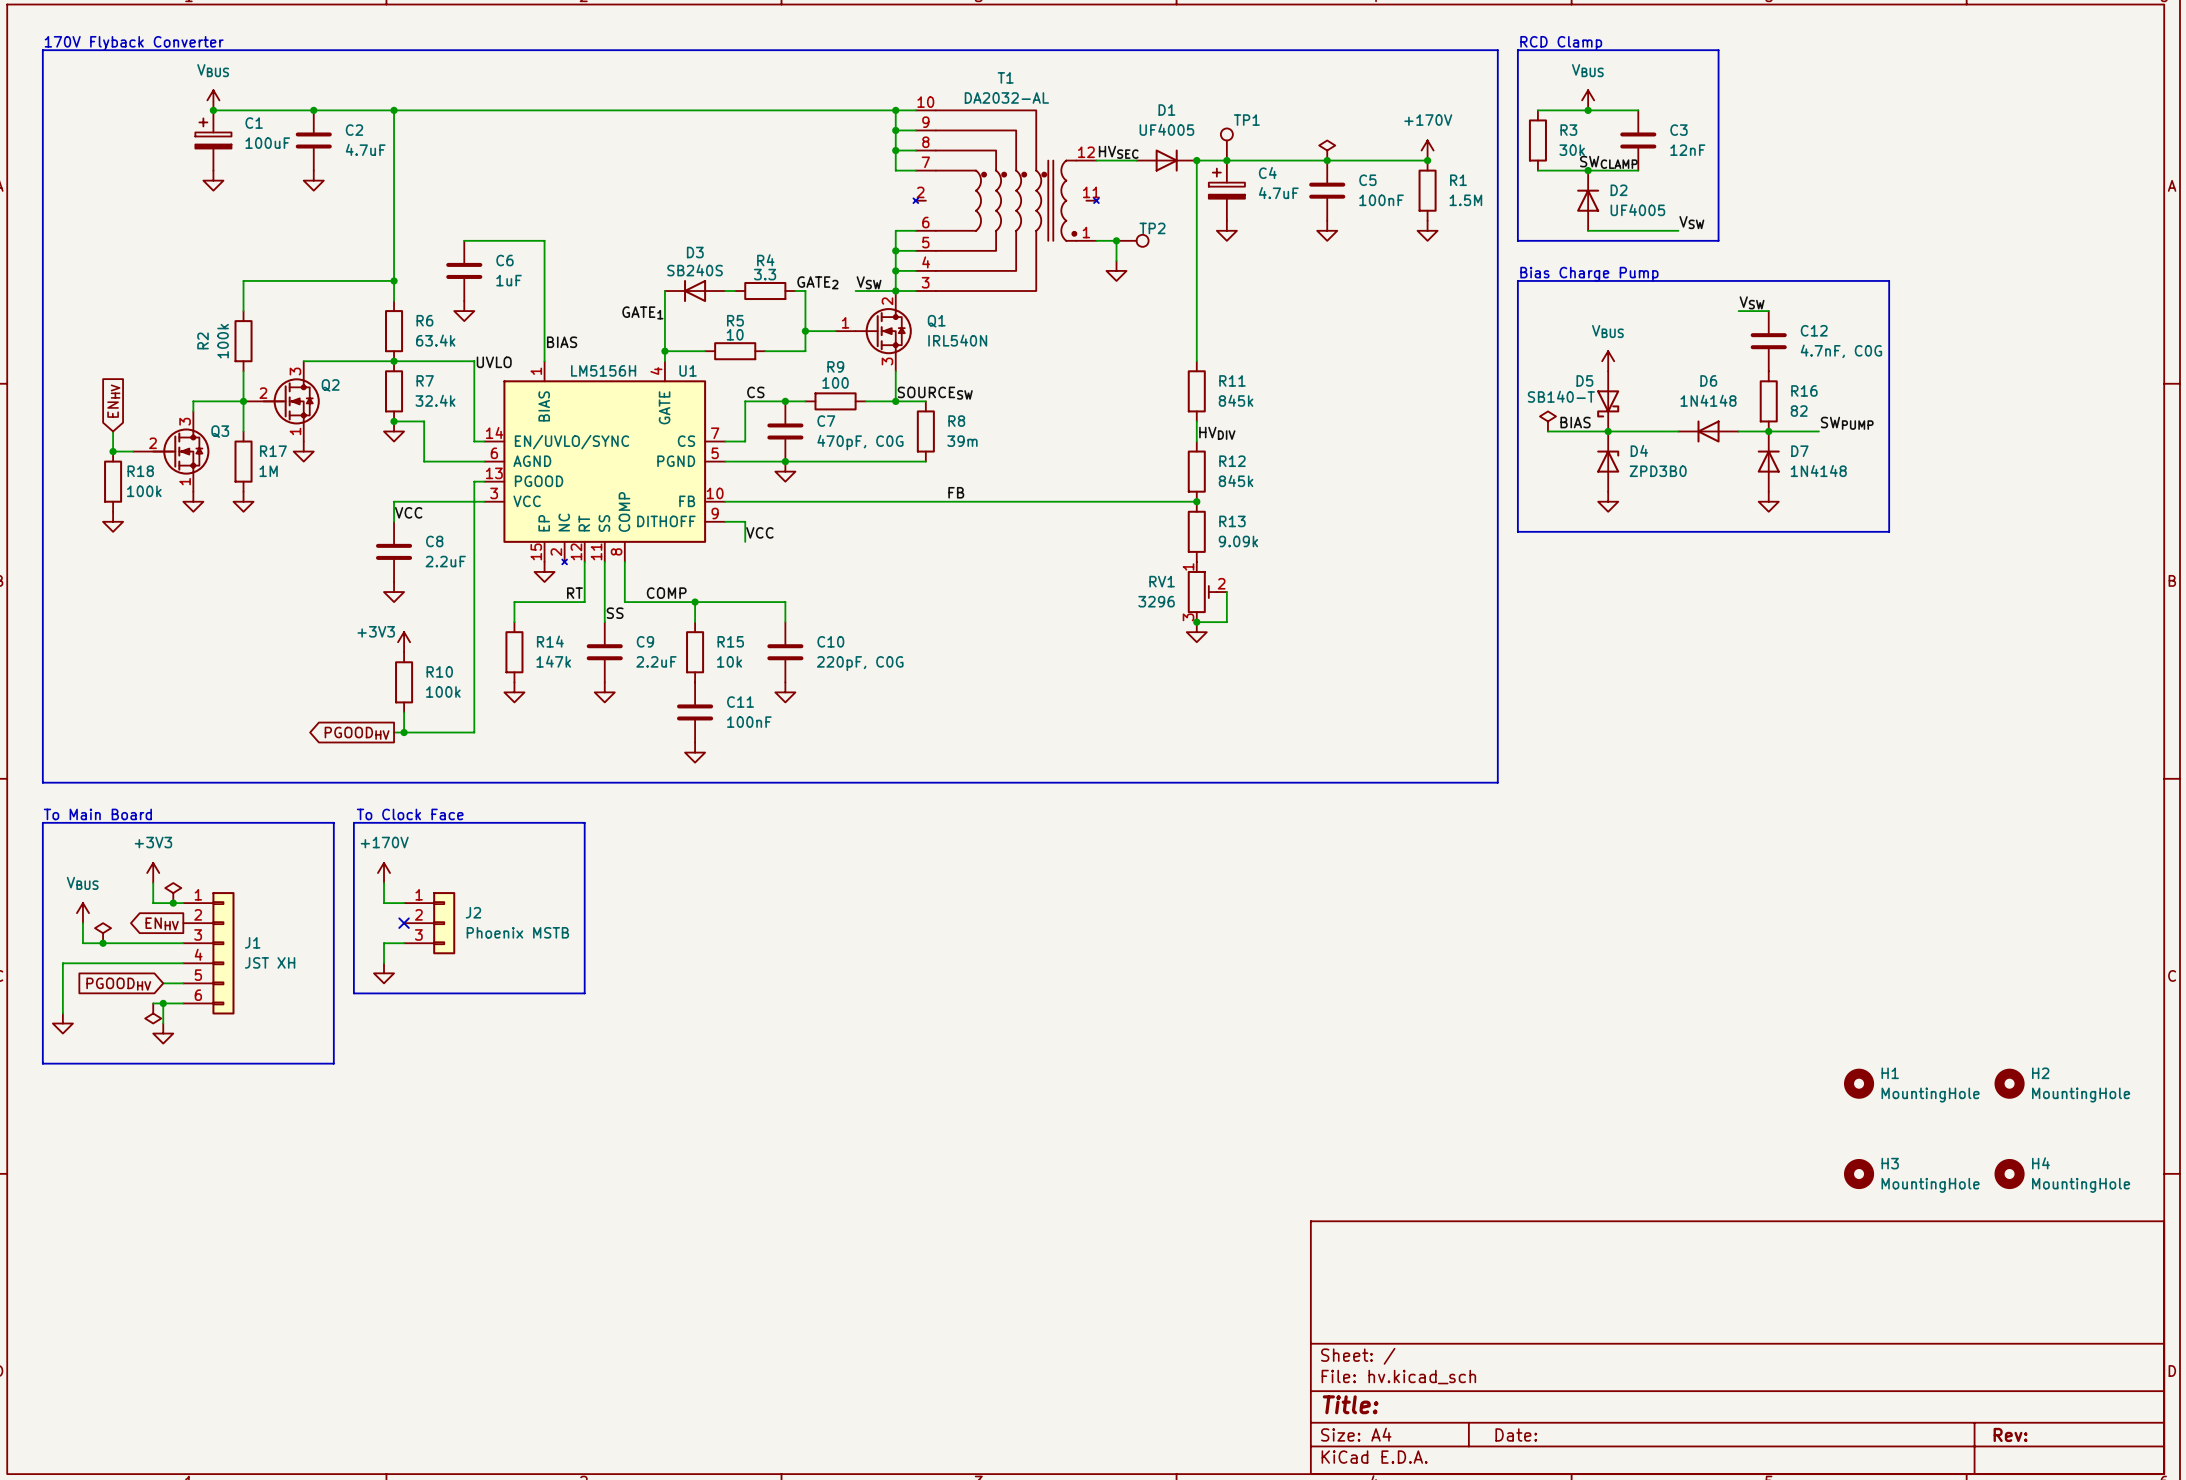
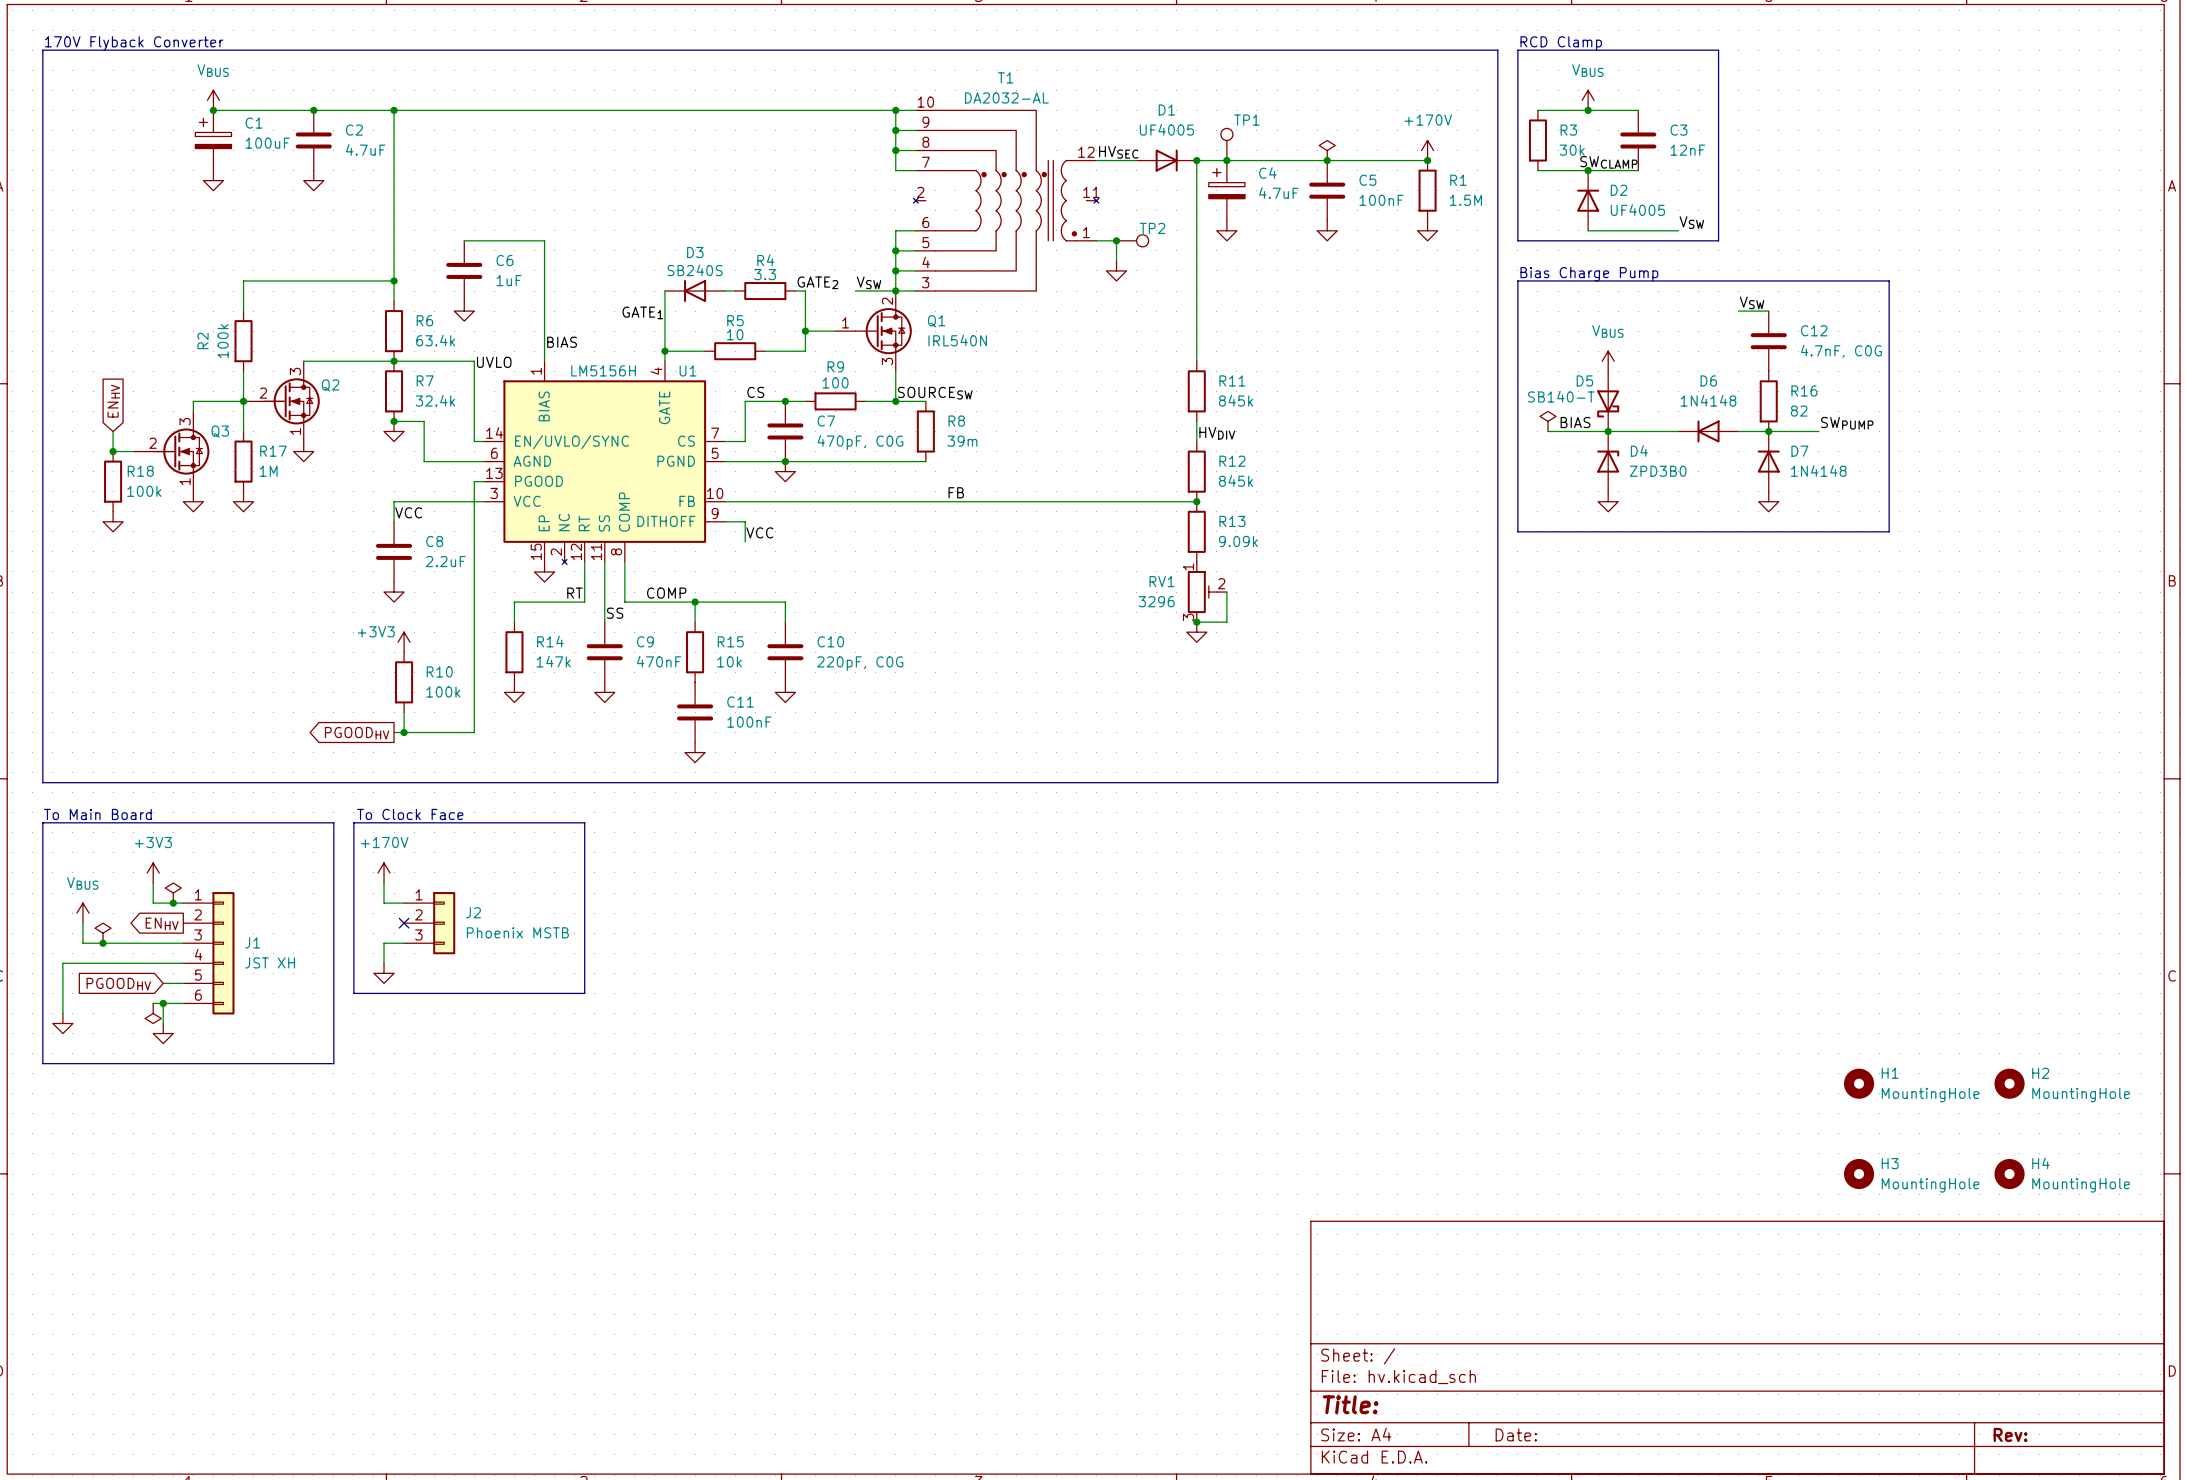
C9 value: 2.2uF (656, 661) -> 470nF (659, 661)

